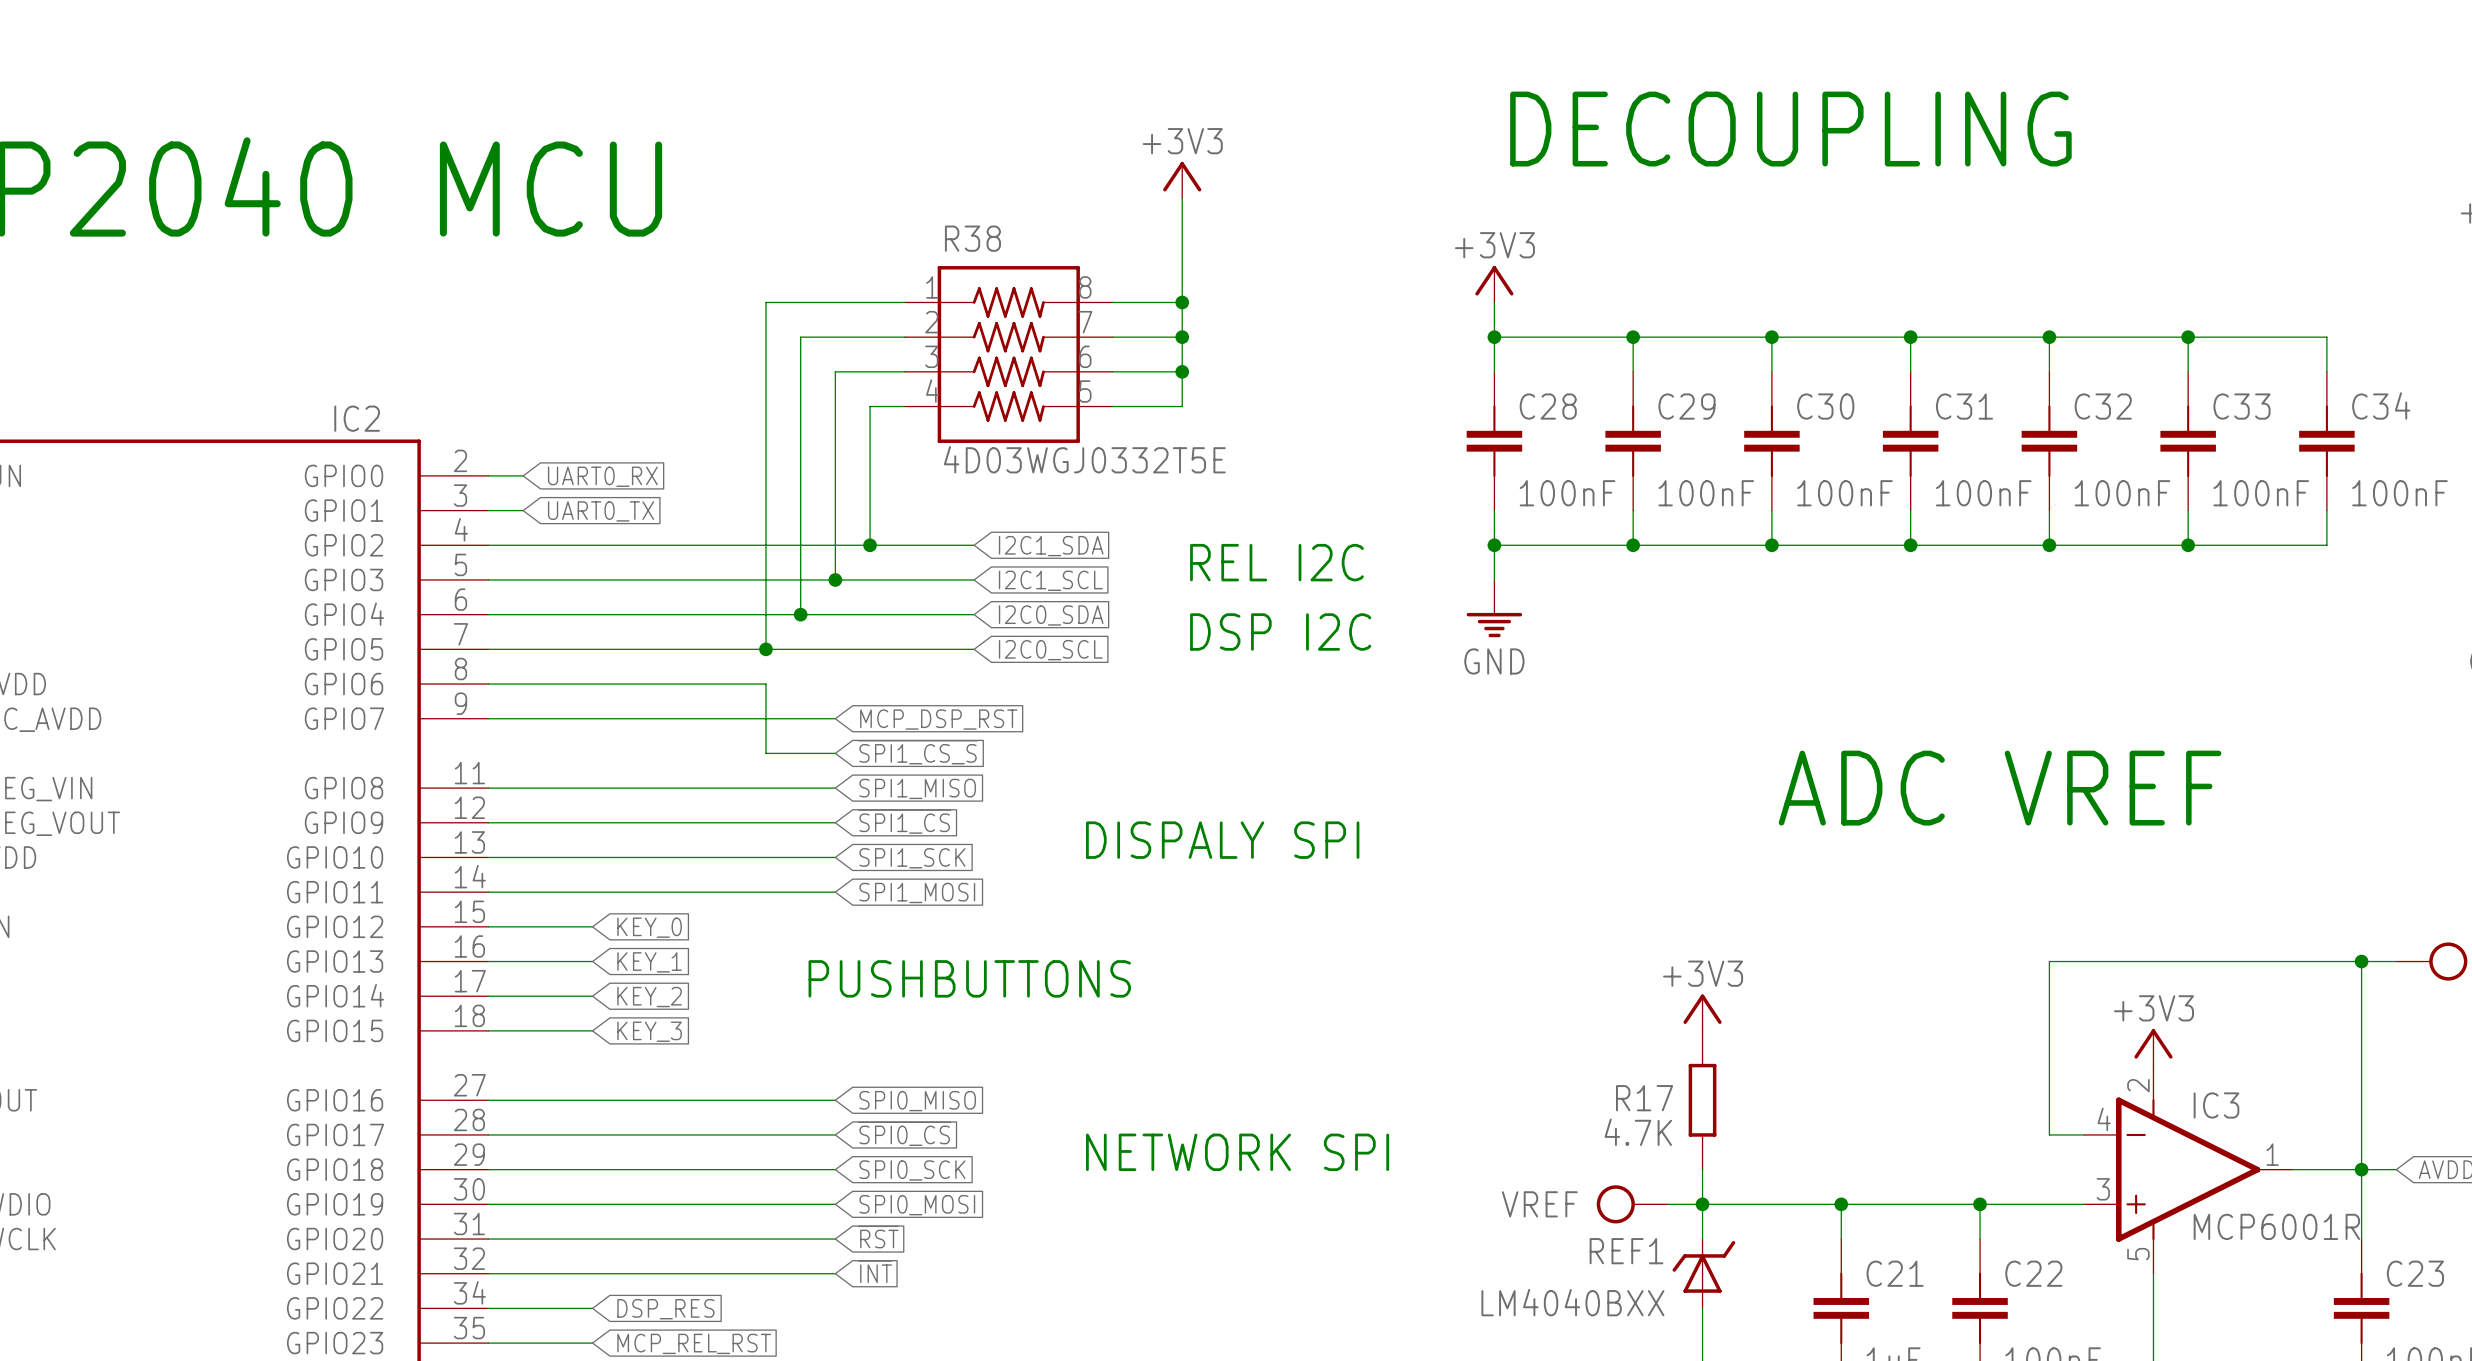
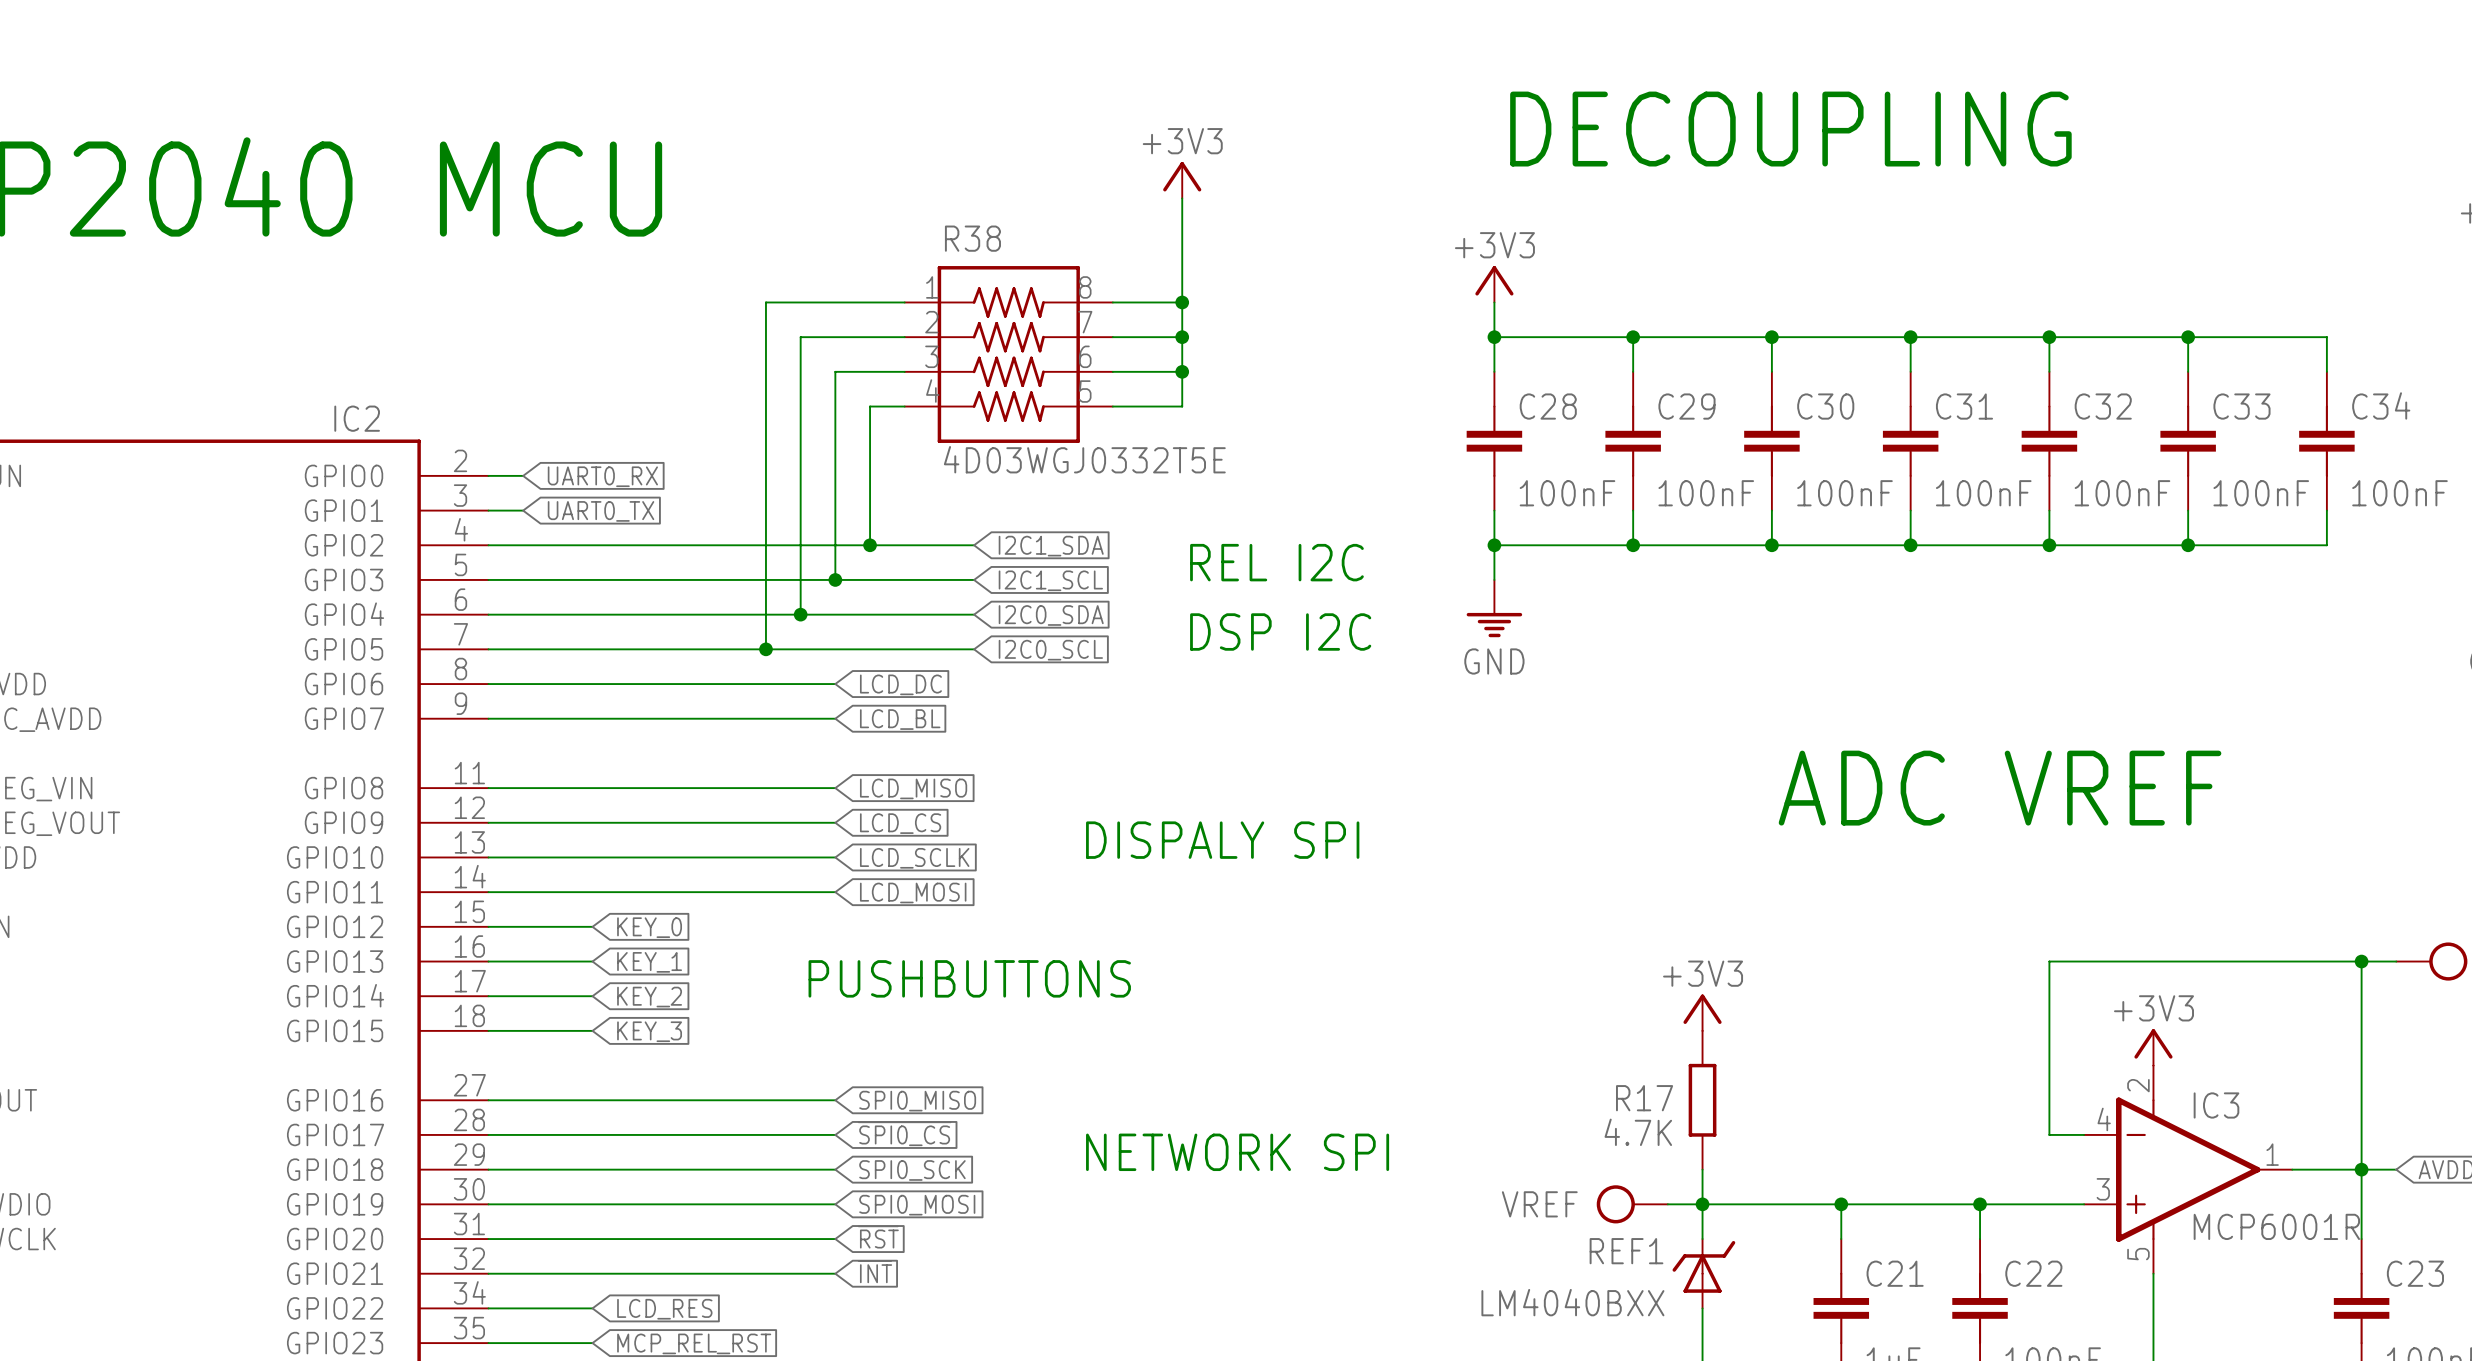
wire: (765, 684) (765, 753) (835, 753) -> (765, 684) (835, 684)
global label: none -> LCD_DC (900, 684)
global label: MCP_DSP_RST (938, 719) -> LCD_BL (900, 719)
global label: ~{SPI1_CS_S} (918, 752) -> none
global label: SPI1_MISO (917, 788) -> LCD_MISO (913, 788)
global label: ~{SPI1_CS} (904, 821) -> LCD_CS (900, 823)
global label: SPI1_SCK (912, 858) -> LCD_SCLK (914, 858)
global label: SPI1_MOSI (917, 892) -> LCD_MOSI (913, 892)
global label: DSP_RES (665, 1309) -> LCD_RES (664, 1309)

